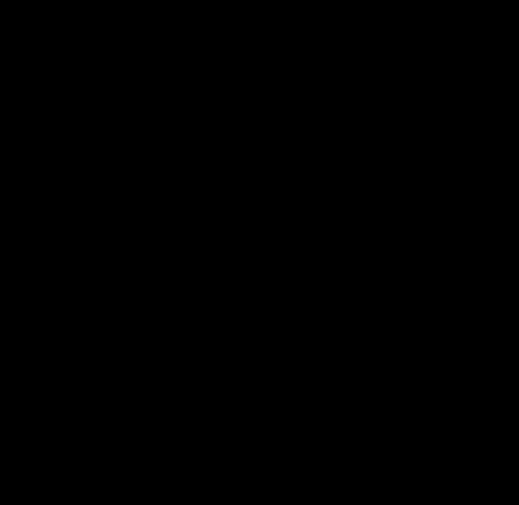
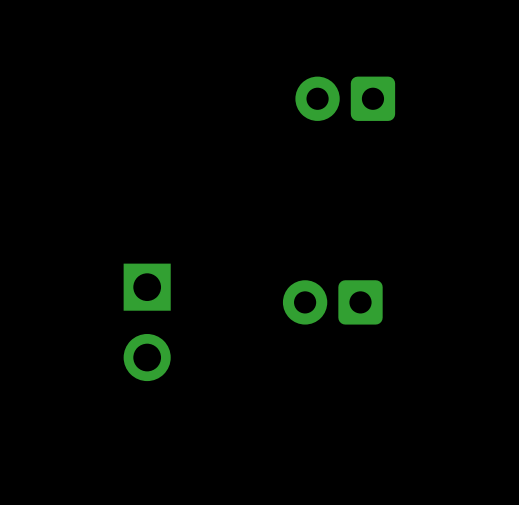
part: none -> (345, 98)
part: none -> (332, 302)
part: none -> (147, 322)

